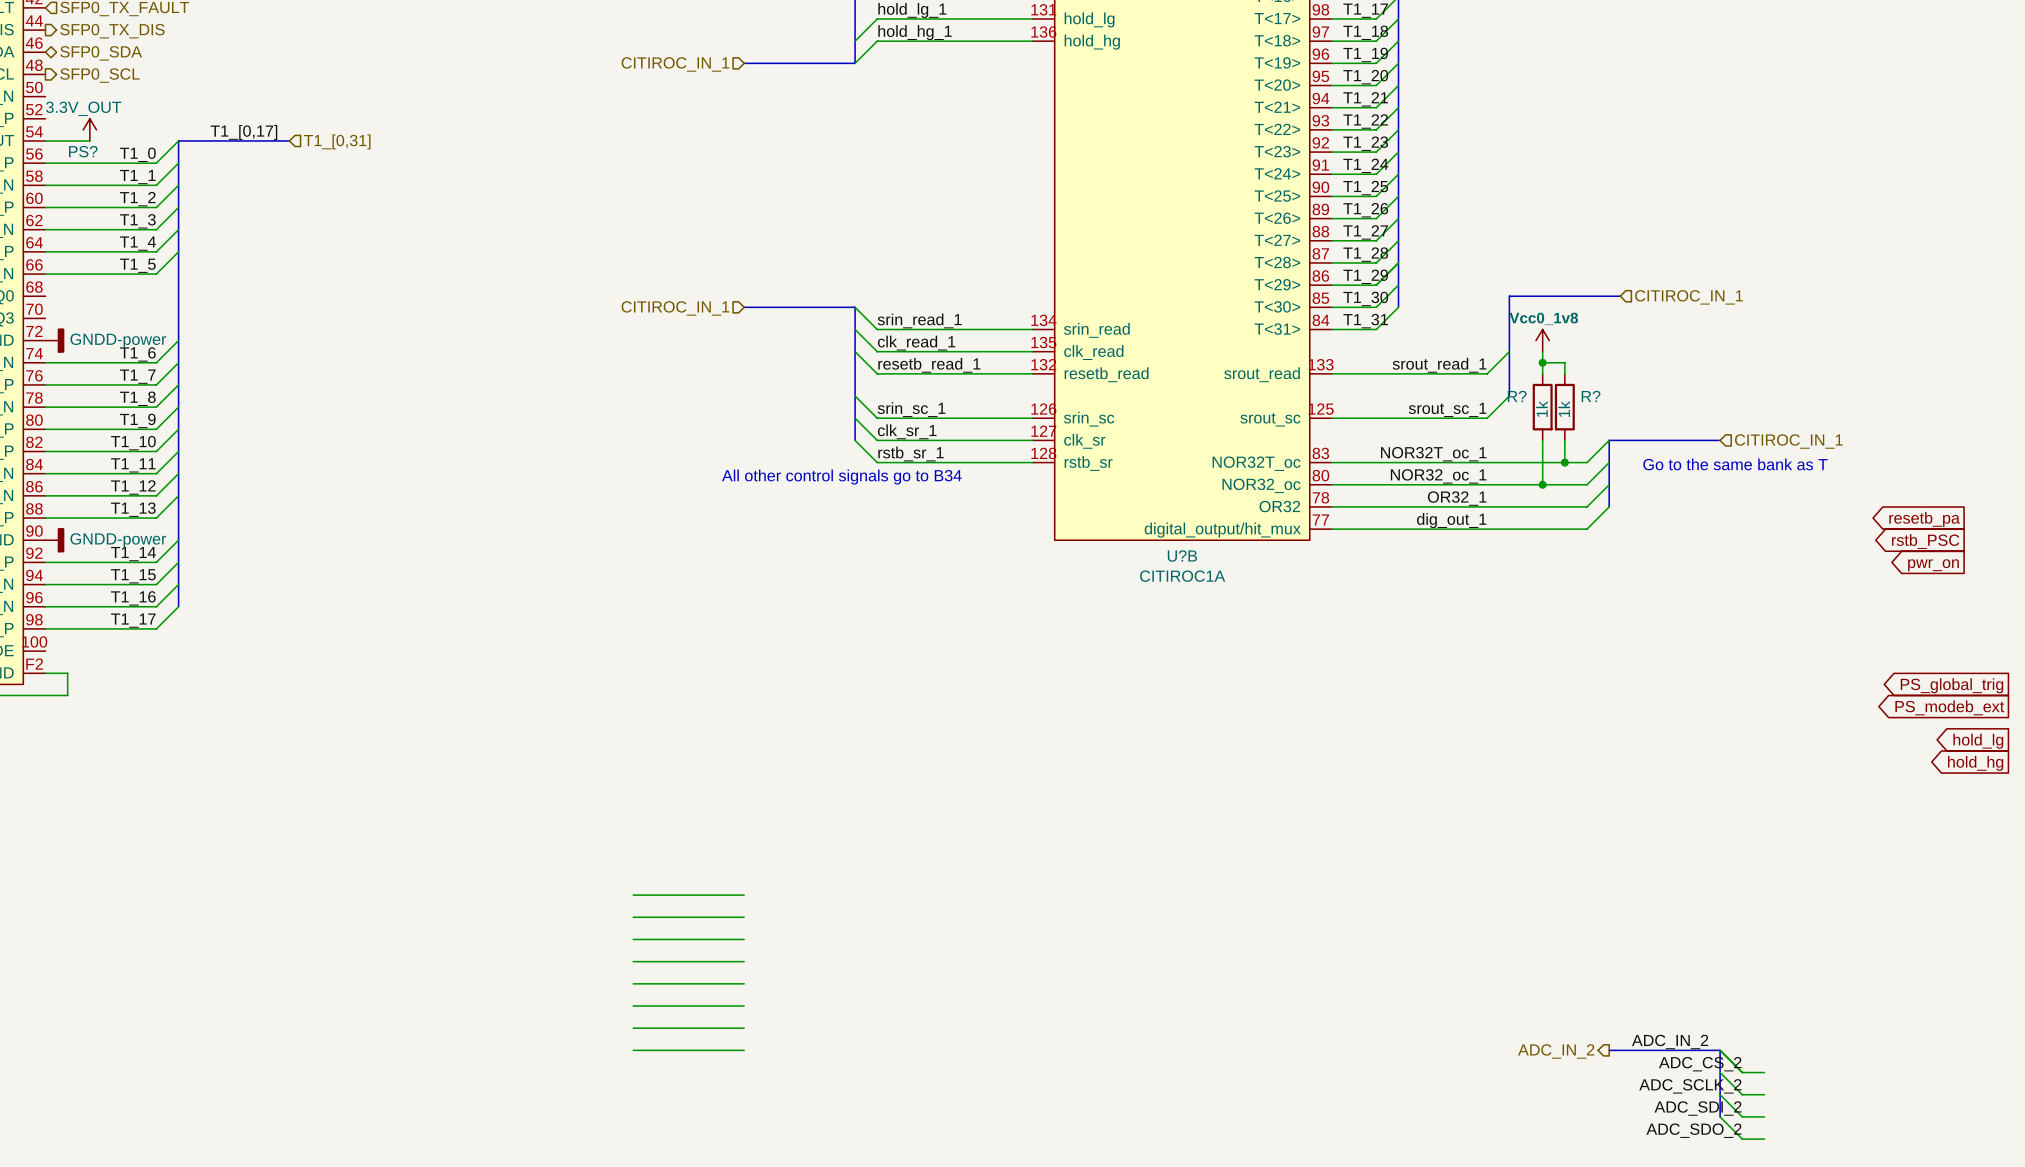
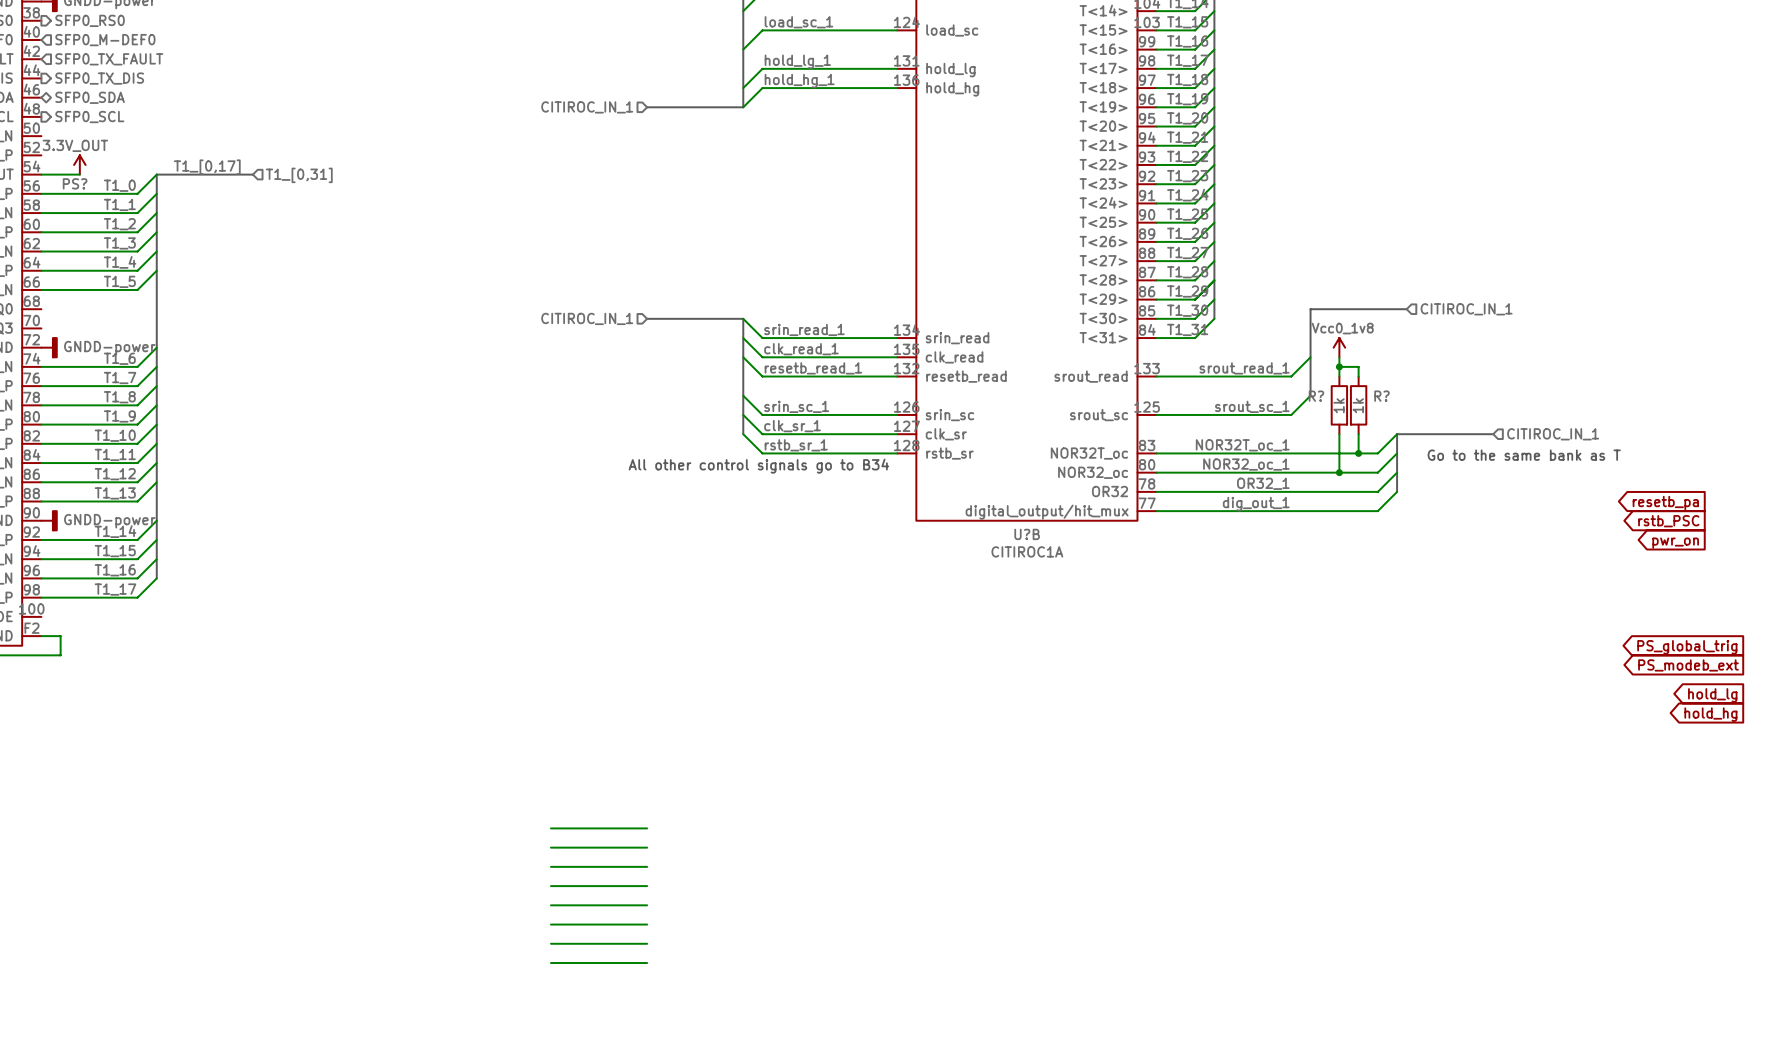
label: ADC_IN_2 (1670, 1041) -> none
bus: (1609, 1050) (1720, 1050) (1720, 1116) -> none
wire: (1720, 1050) (1742, 1072) (1764, 1072) -> none
hierarchical label: ADC_IN_2 (1556, 1051) -> none
label: ADC_CS_2 (1700, 1064) -> none
wire: (1720, 1072) (1742, 1094) (1764, 1094) -> none
label: ADC_SCLK_2 (1690, 1086) -> none
wire: (1720, 1094) (1742, 1116) (1764, 1116) -> none
label: ADC_SDI_2 (1697, 1108) -> none
wire: (1720, 1116) (1742, 1139) (1764, 1139) -> none
label: ADC_SDO_2 (1693, 1130) -> none

